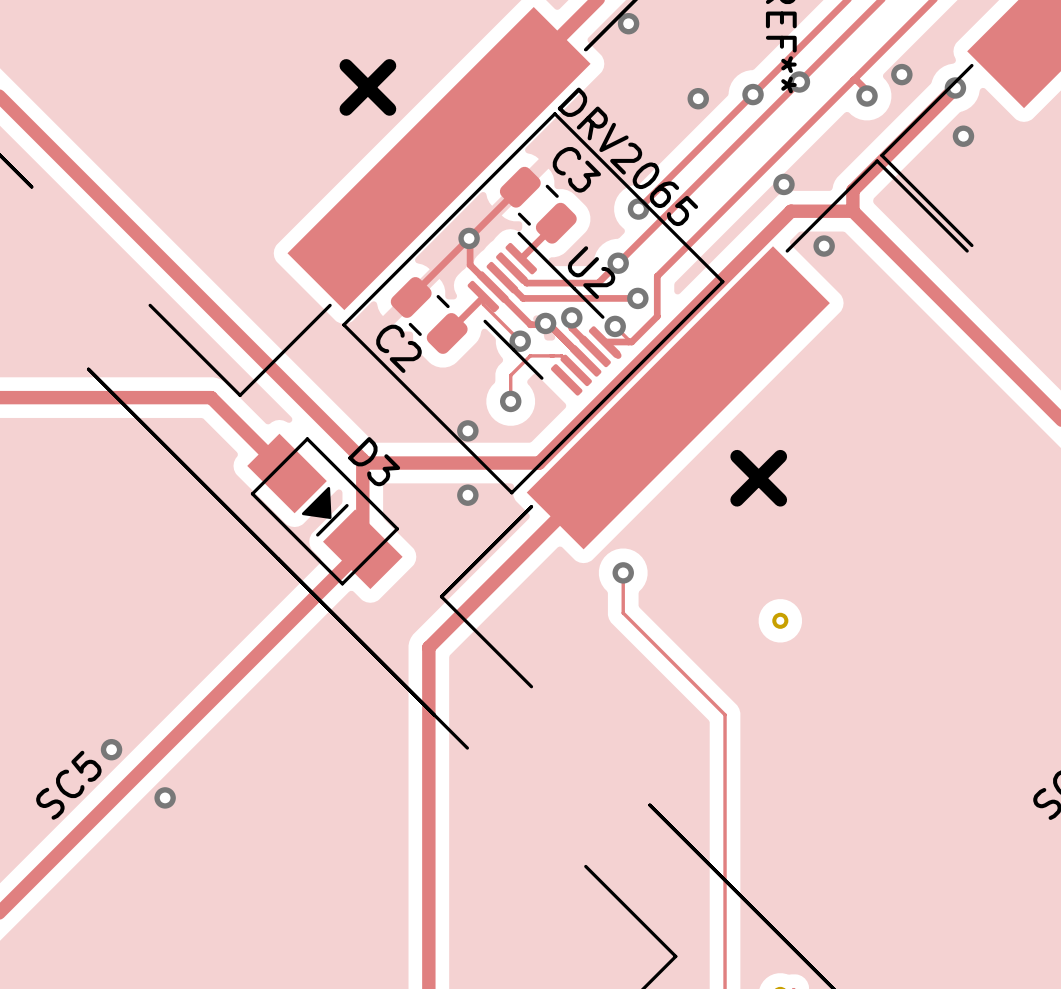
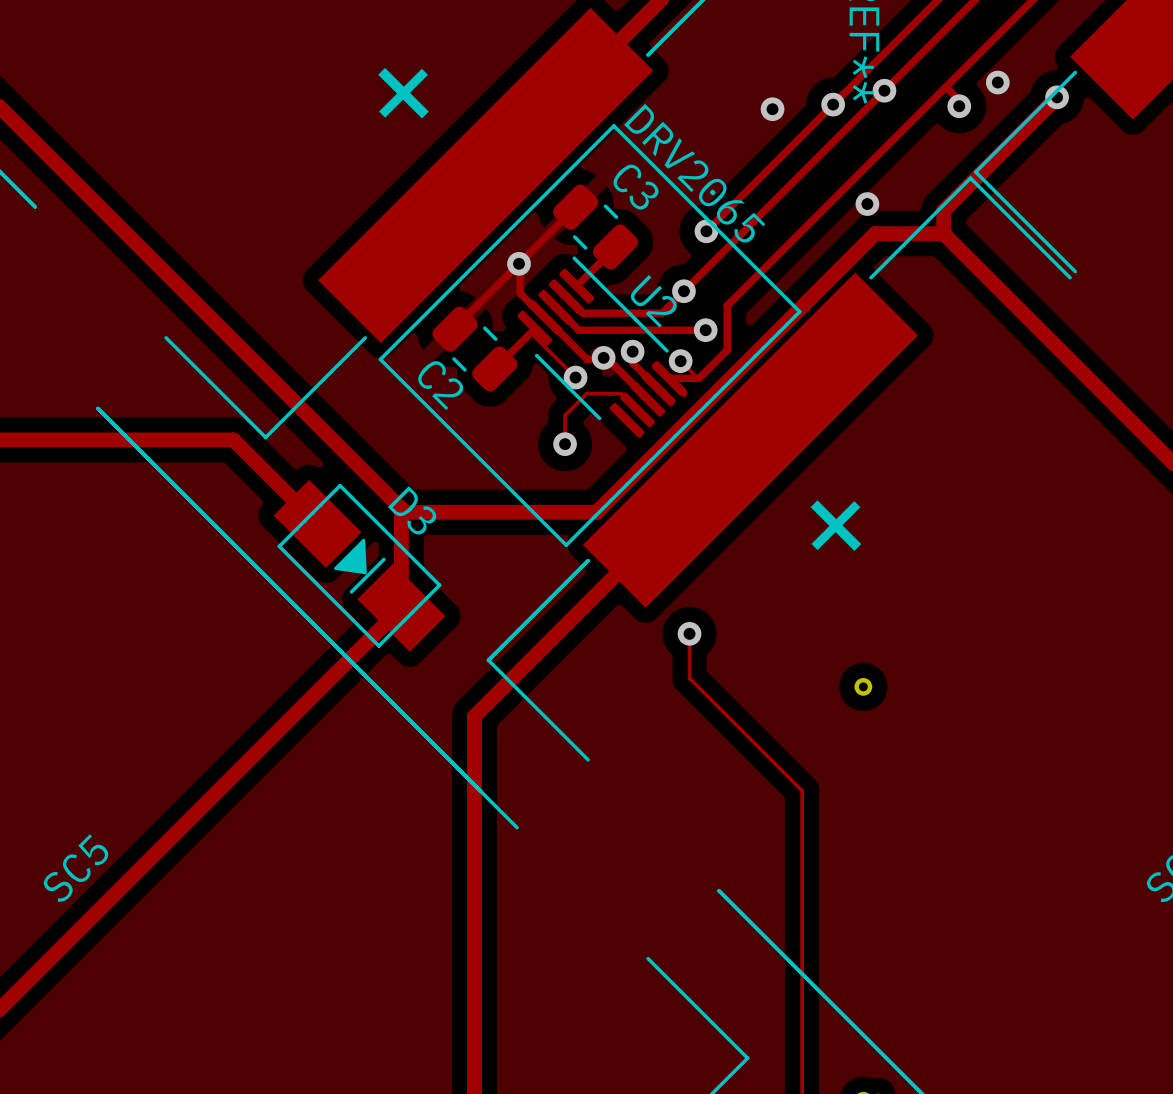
via: (628, 23) -> none
via: (963, 136) -> none
via: (824, 246) -> none
via: (467, 430) -> none
via: (467, 495) -> none
via: (111, 749) -> none
via: (165, 797) -> none

